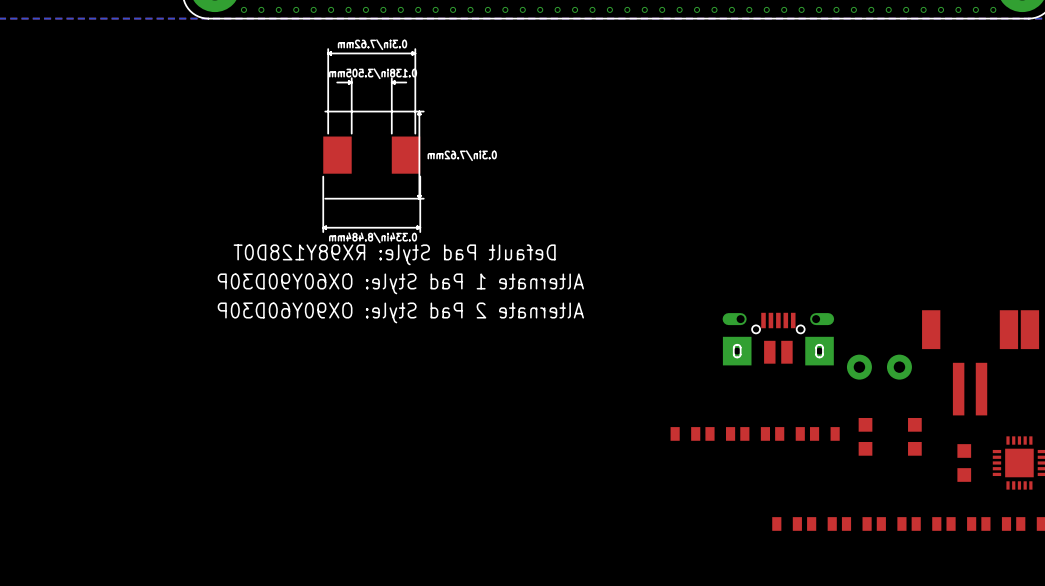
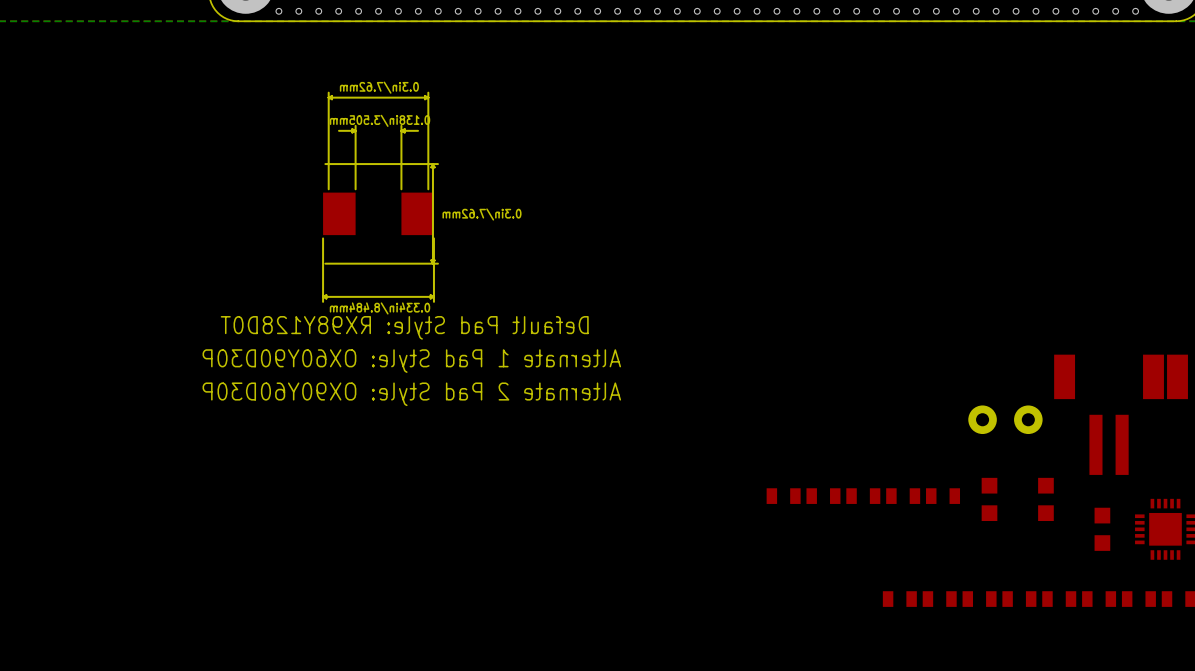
part position: (373, 140) -> (380, 197)
part: (778, 339) -> none

